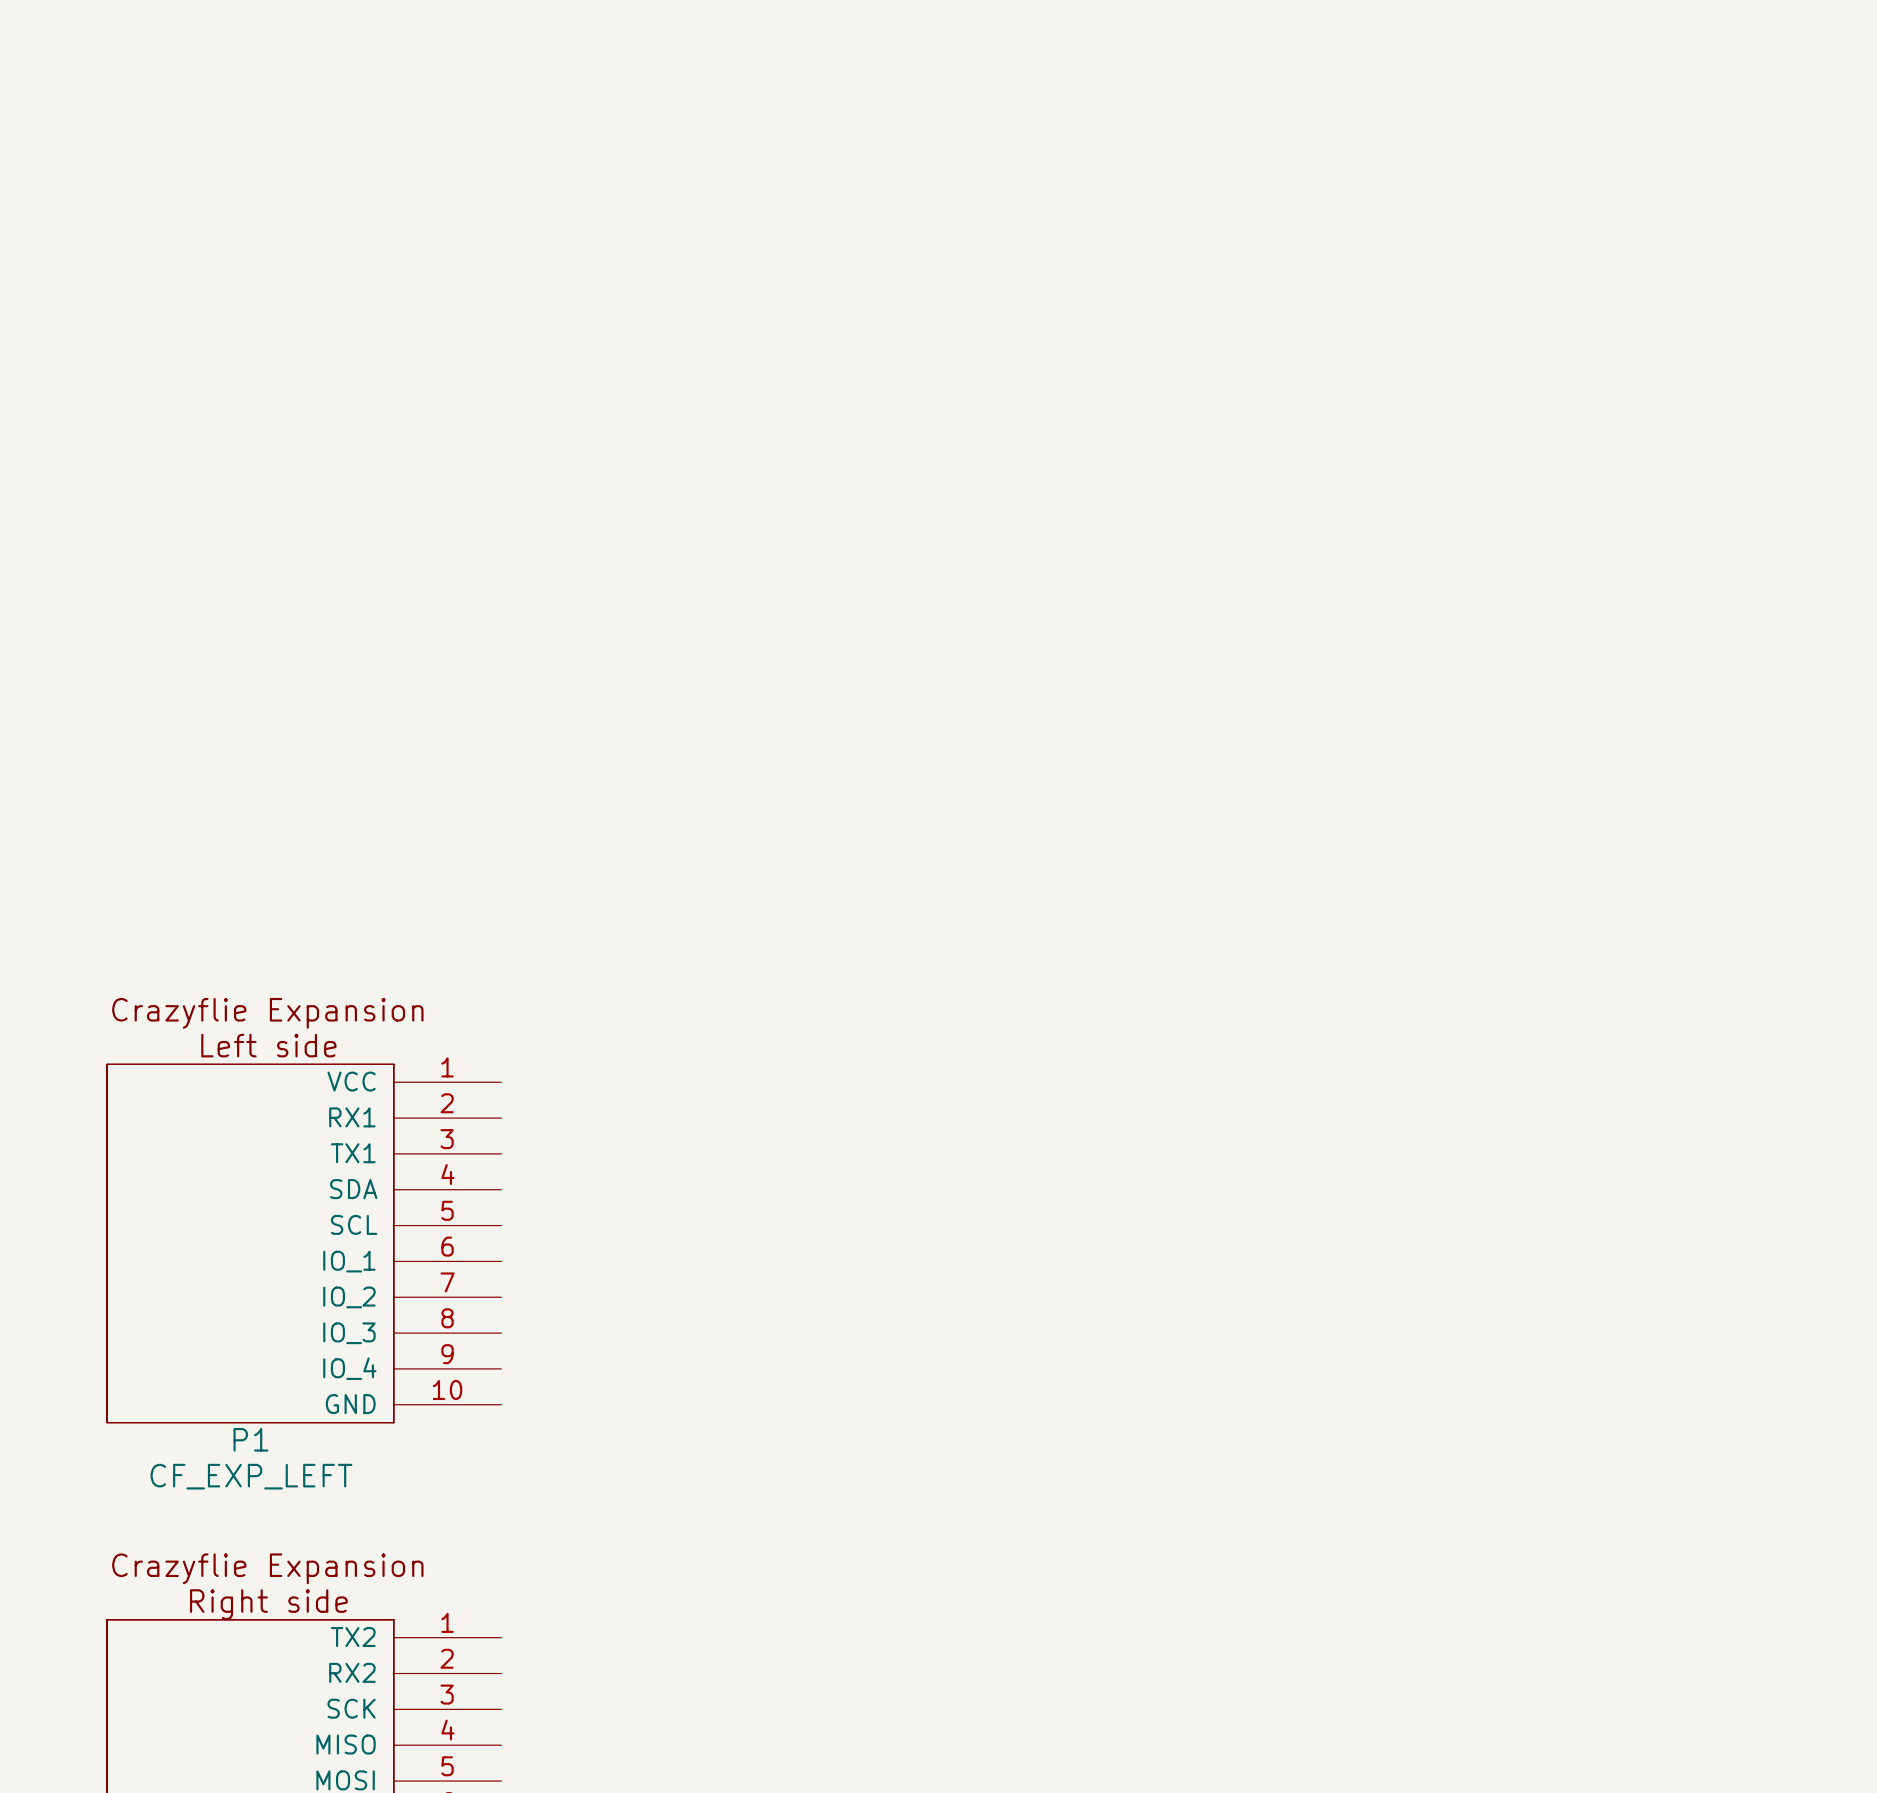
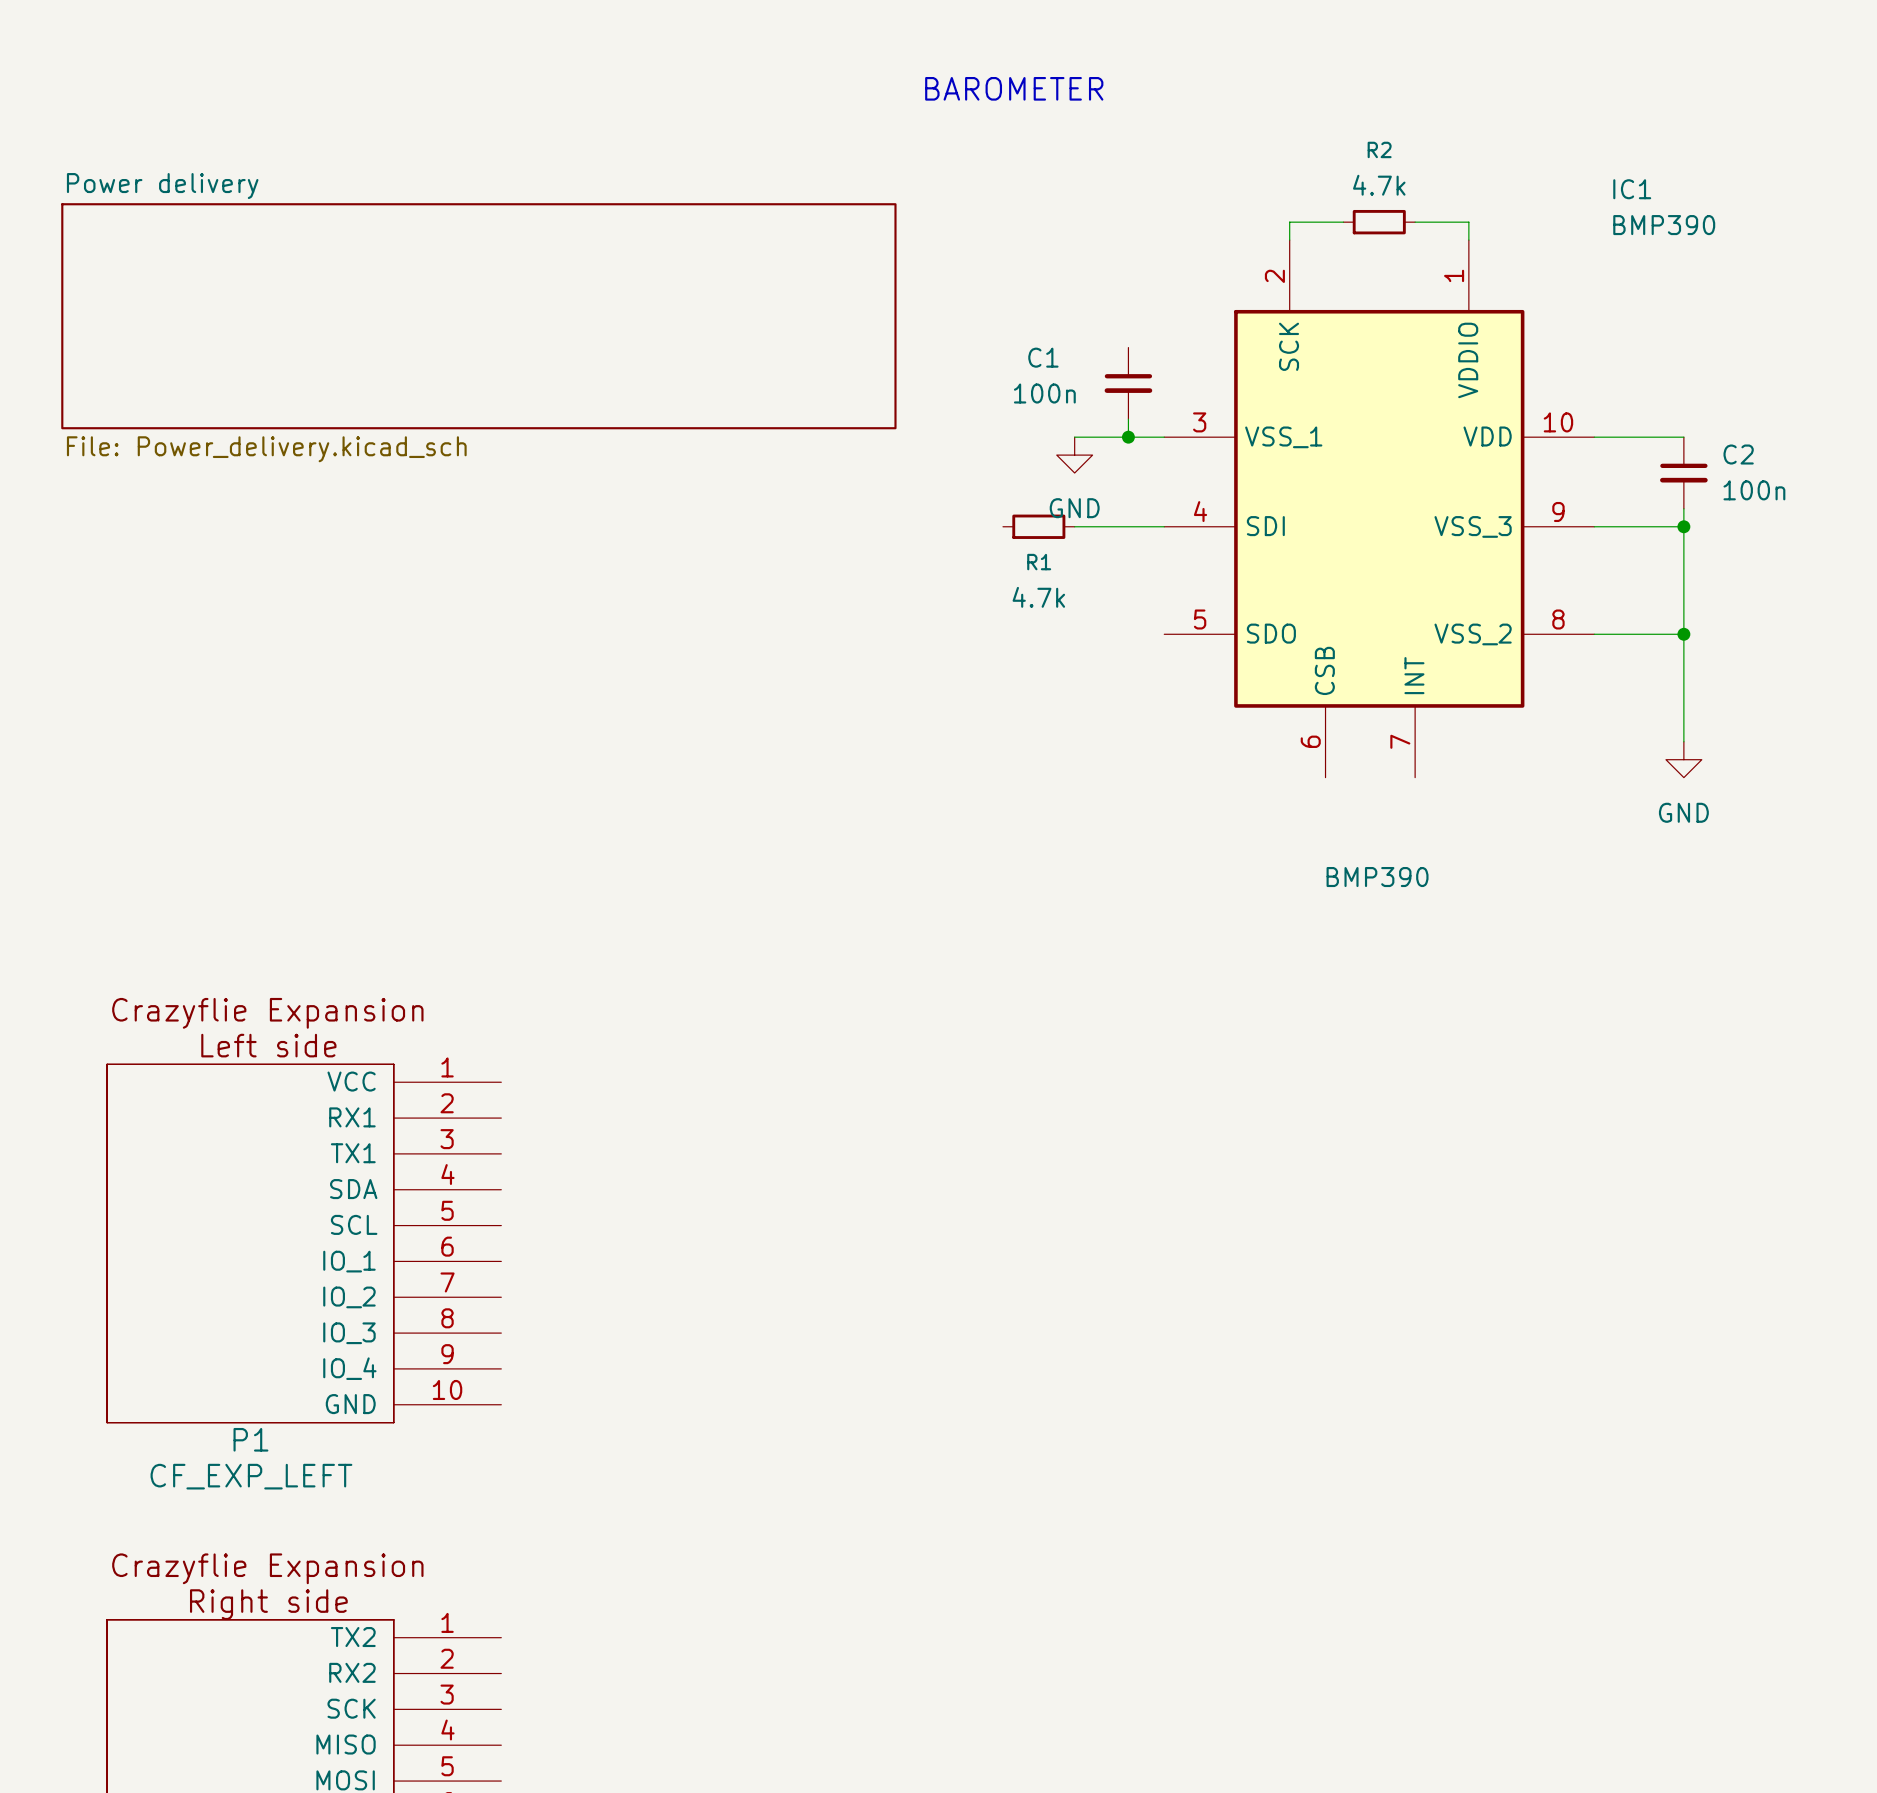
text: none -> BAROMETER (1014, 88)
wire: none -> (1343, 222) (1289, 222) (1289, 240)
R2: none -> 4.7k (1379, 222)
wire: none -> (1415, 222) (1468, 222) (1468, 240)
sheet Power delivery: none -> File: Power_delivery.kicad_sch (478, 316)
C1: none -> 100n (1128, 383)
wire: none -> (1128, 419) (1128, 437)
wire: none -> (1074, 437) (1164, 437)
junction: none -> (1128, 437)
wire: none -> (1594, 437) (1683, 437)
power symbol: none -> GND (1074, 455)
C2: none -> 100n (1683, 473)
IC1: none -> BMP390 (1379, 508)
wire: none -> (1683, 508) (1683, 741)
R1: none -> 4.7k (1038, 526)
wire: none -> (1074, 526) (1164, 526)
wire: none -> (1594, 526) (1683, 526)
junction: none -> (1683, 526)
wire: none -> (1594, 634) (1683, 634)
junction: none -> (1683, 634)
power symbol: none -> GND (1683, 759)

